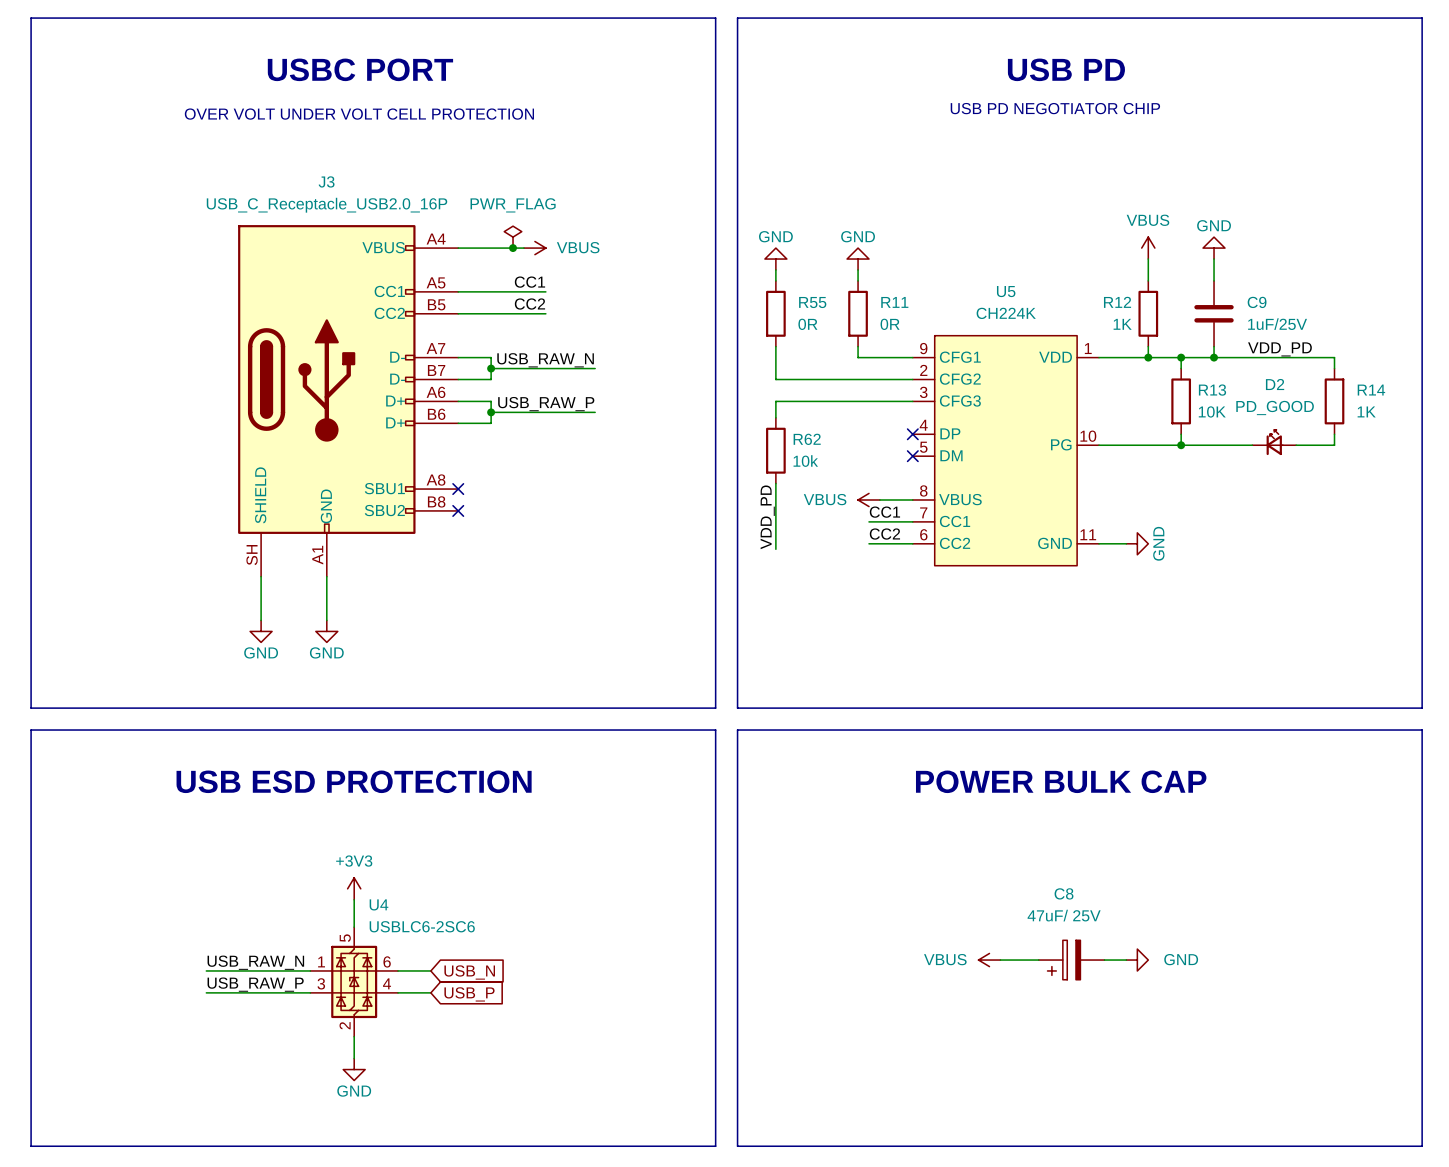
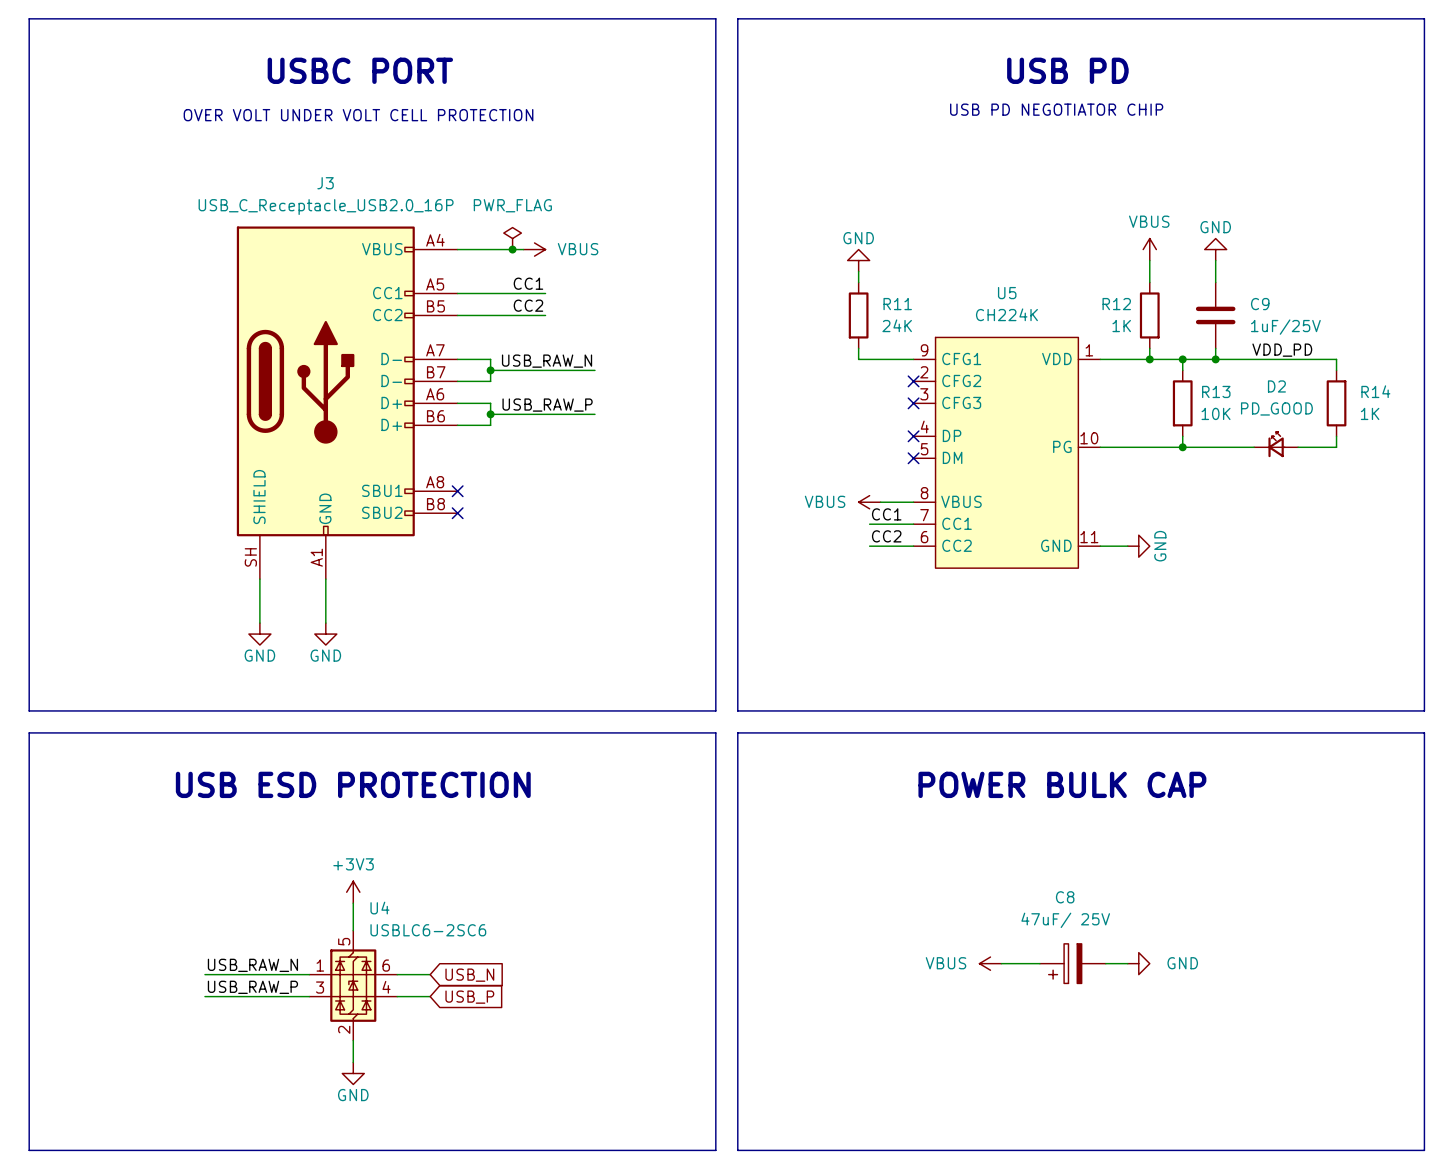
power symbol: GND (775, 259) -> none
wire: (775, 269) (775, 280) -> none
R55: 0R (775, 313) -> none
R11 value: 0R (890, 324) -> 24K (897, 325)
wire: (775, 346) (775, 379) (912, 379) -> none
no-connect mark: none -> (913, 381)
wire: (912, 401) (775, 401) (775, 417) -> none
no-connect mark: none -> (913, 403)
R62: 10k (775, 450) -> none
wire: (775, 483) (775, 549) -> none
label: VDD_PD (767, 517) -> none

